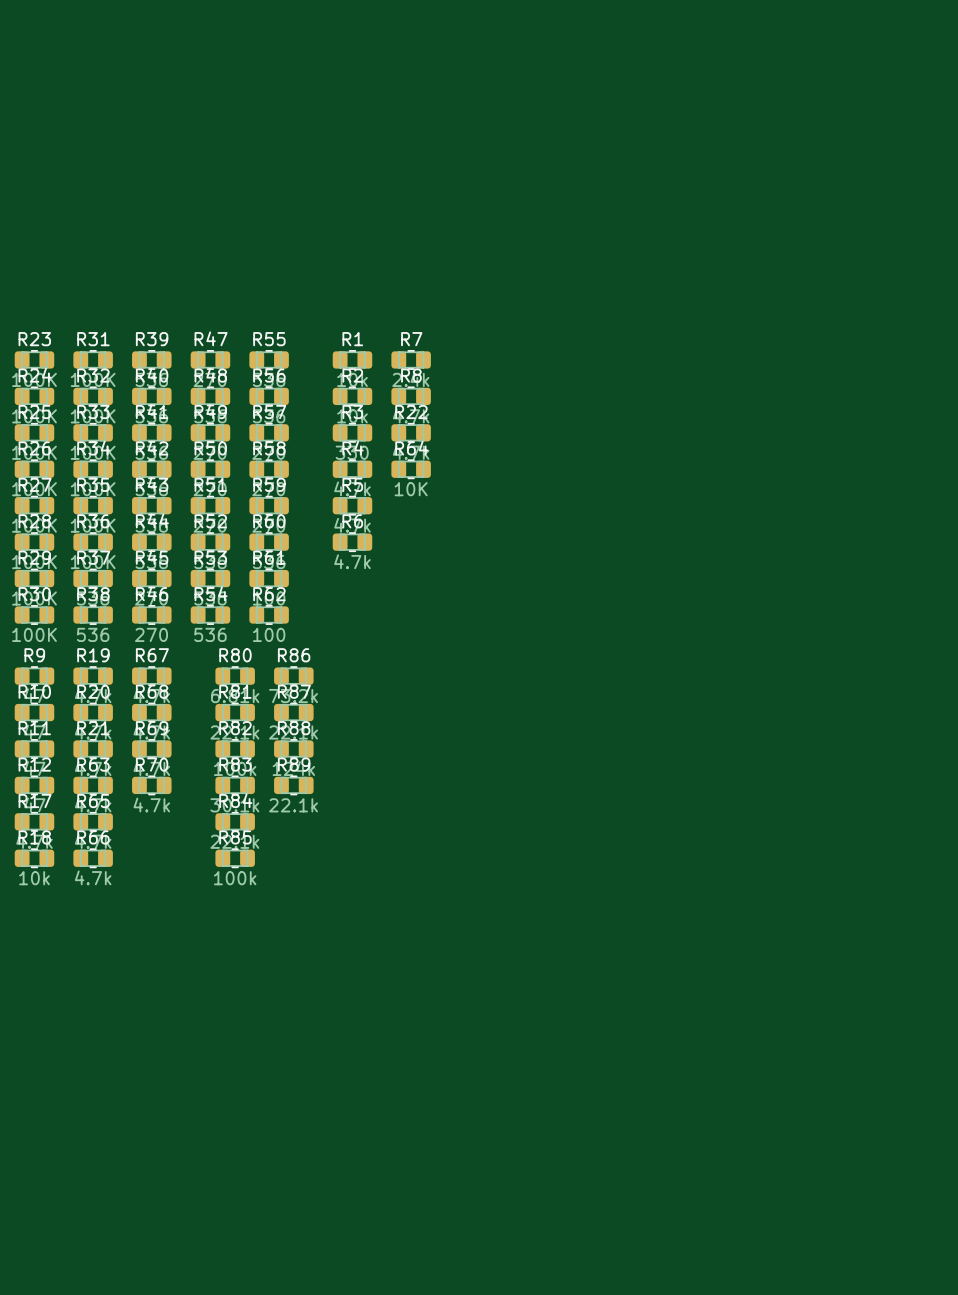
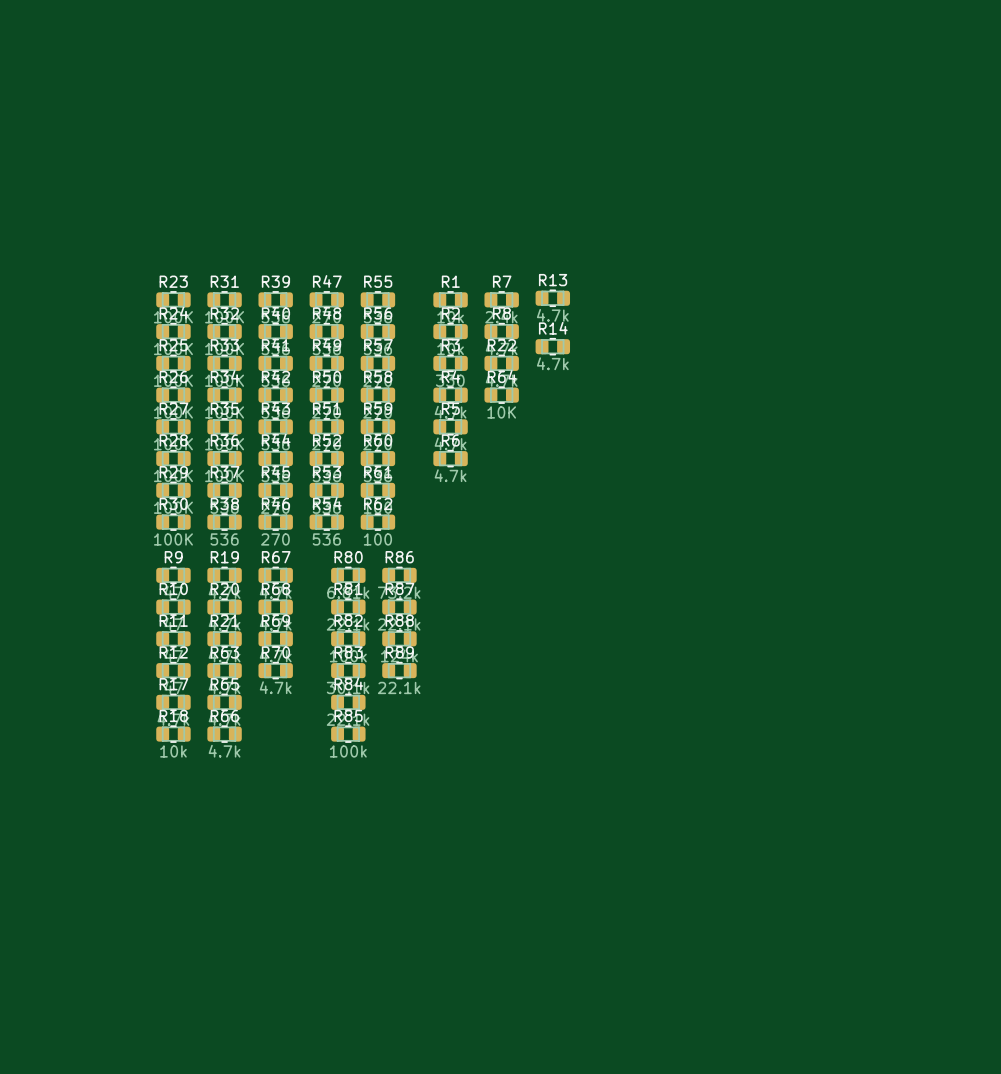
R13: none -> 4.7k (552, 298)
R14: none -> 4.7k (552, 346)

